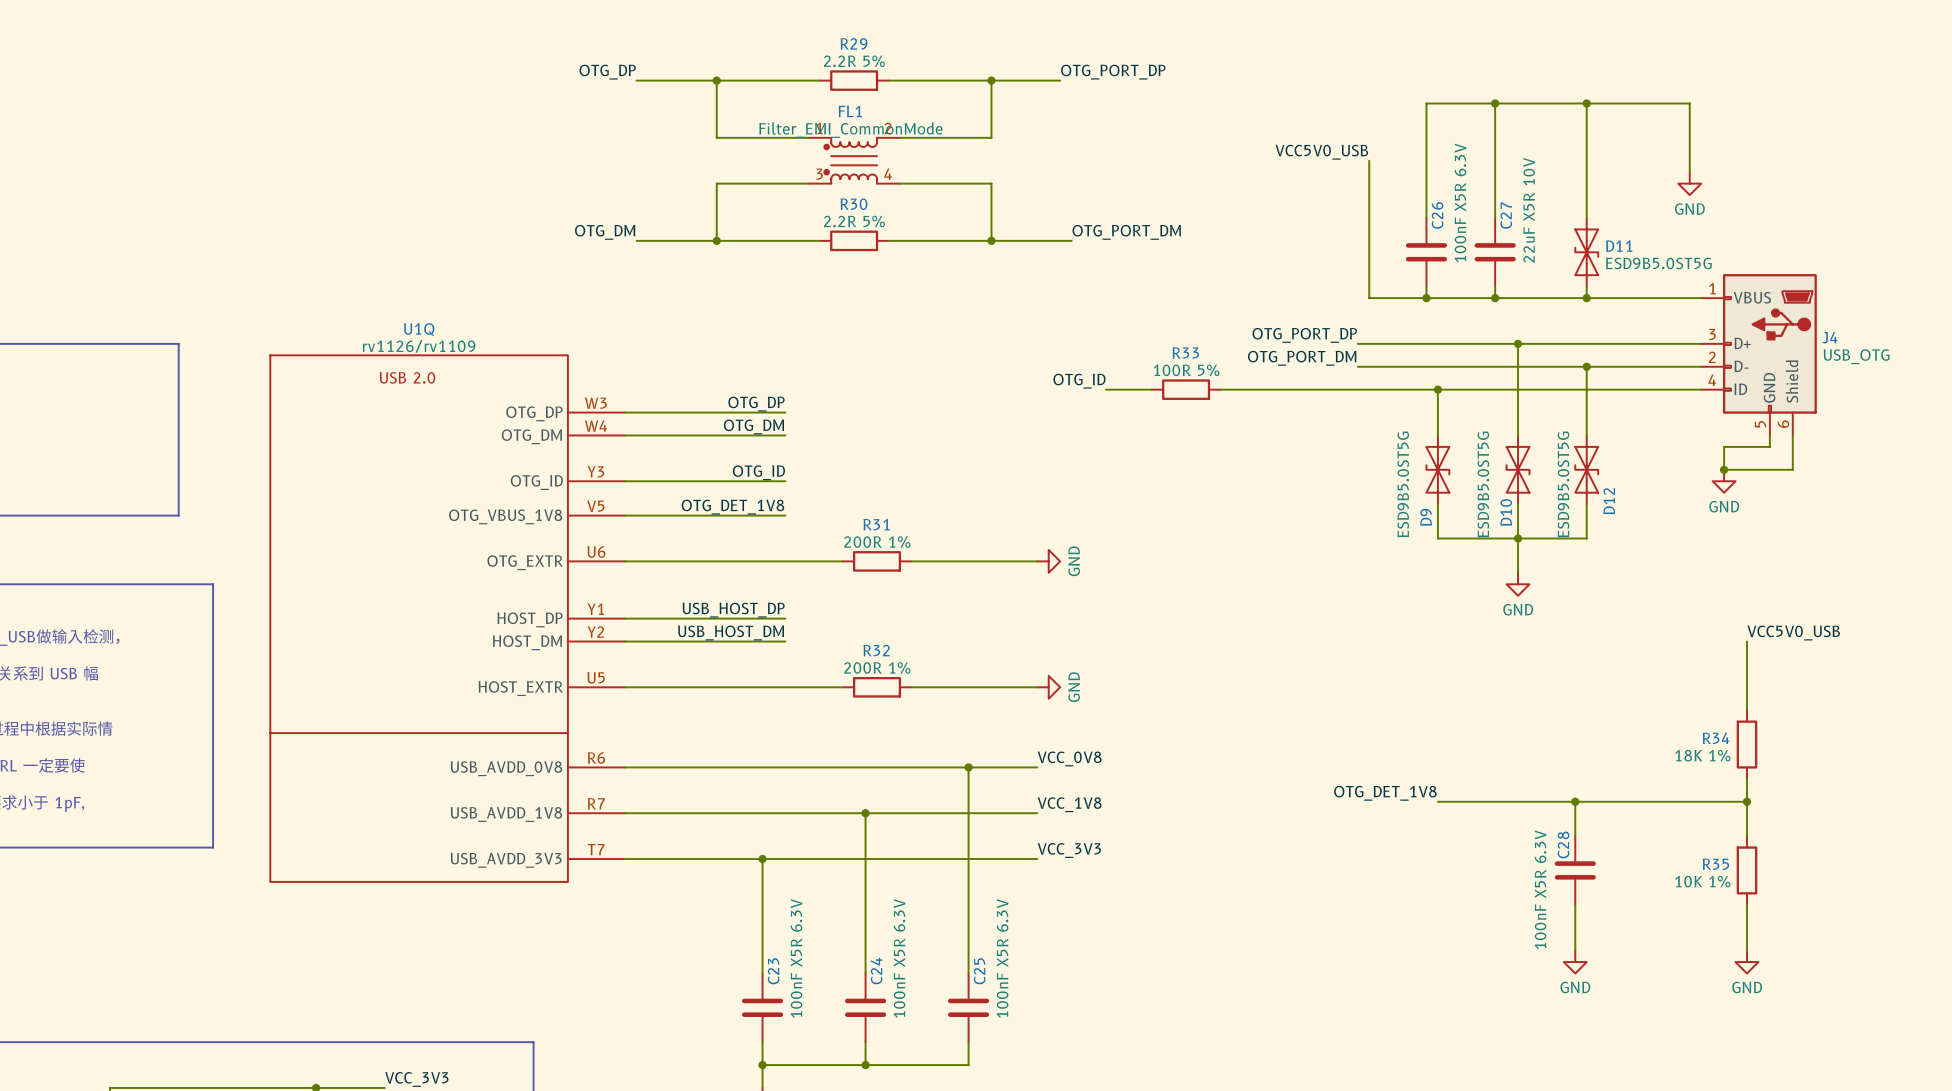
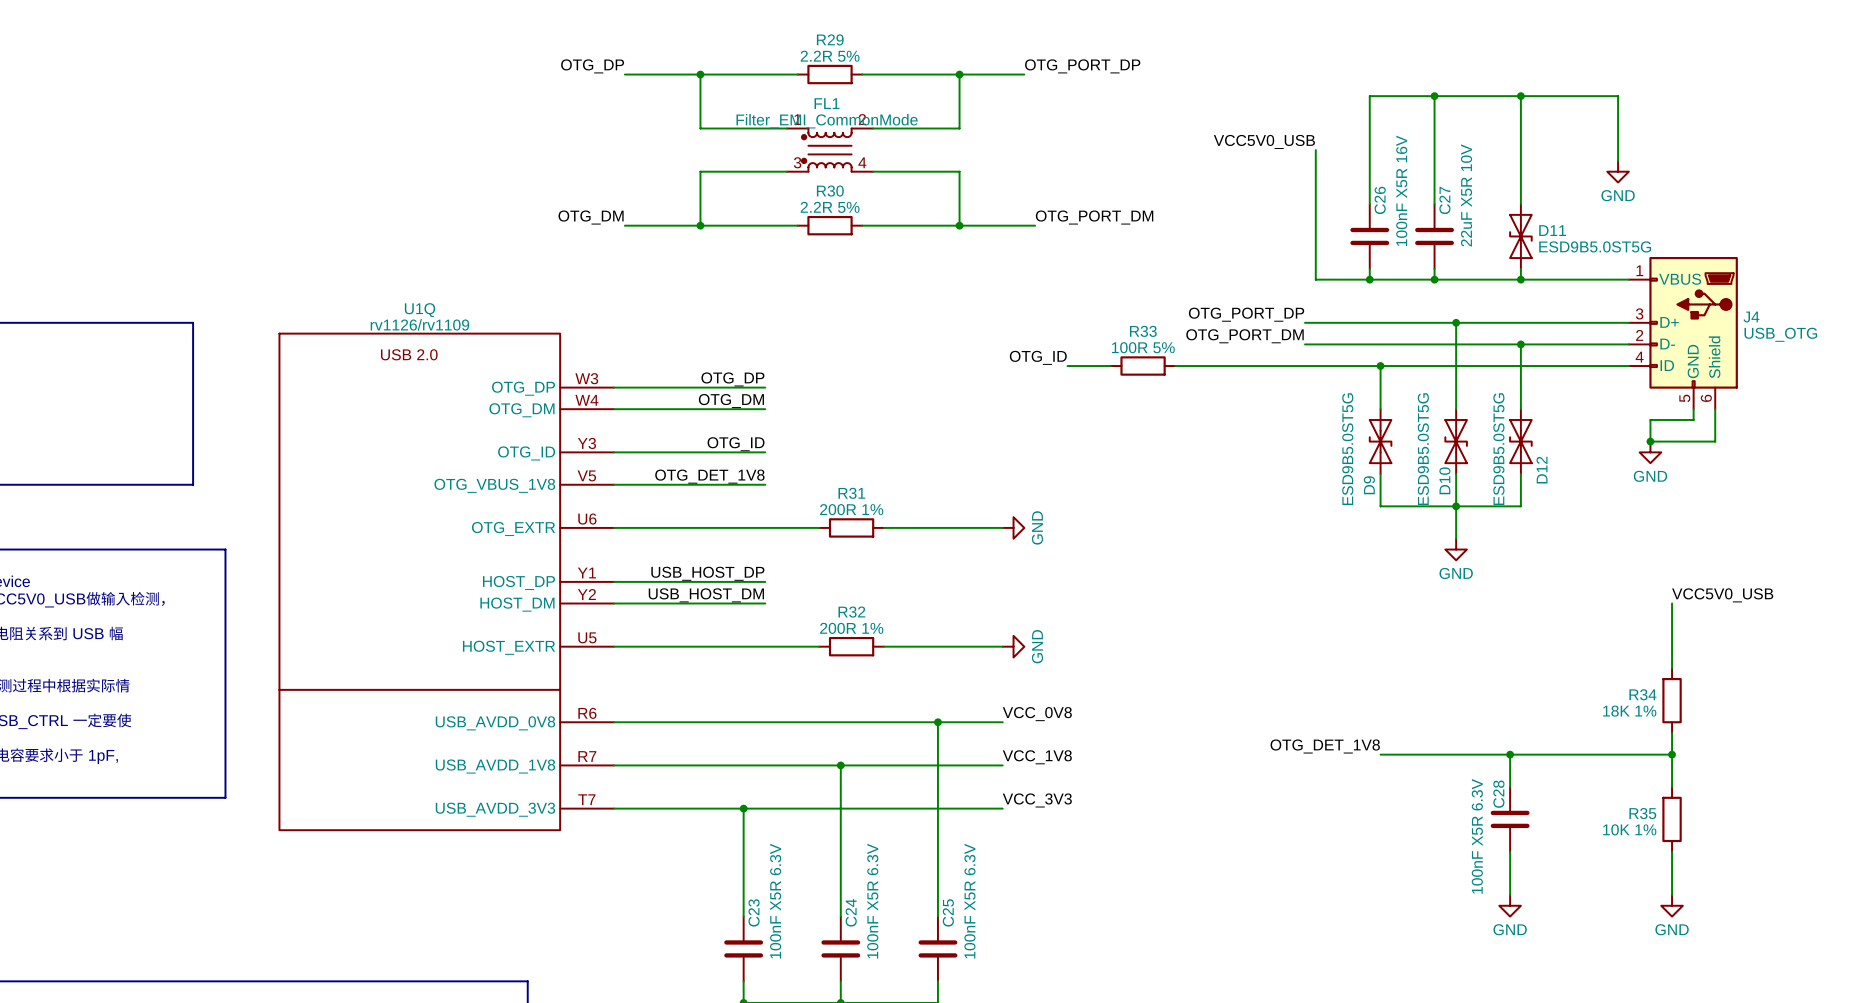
C26 value: 100nF X5R 6.3V (1460, 202) -> 100nF X5R 16V (1401, 190)

